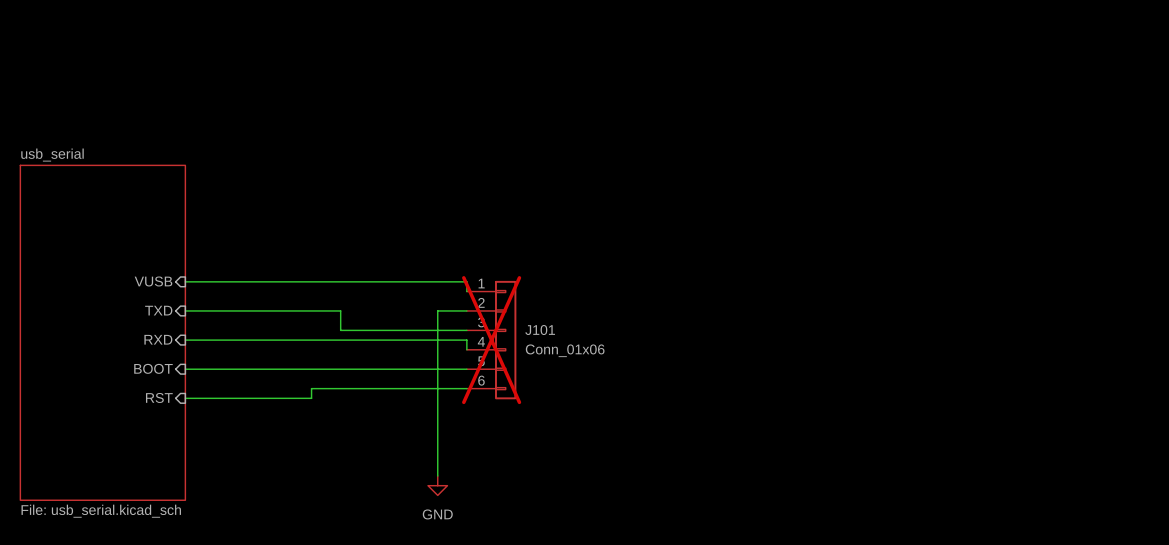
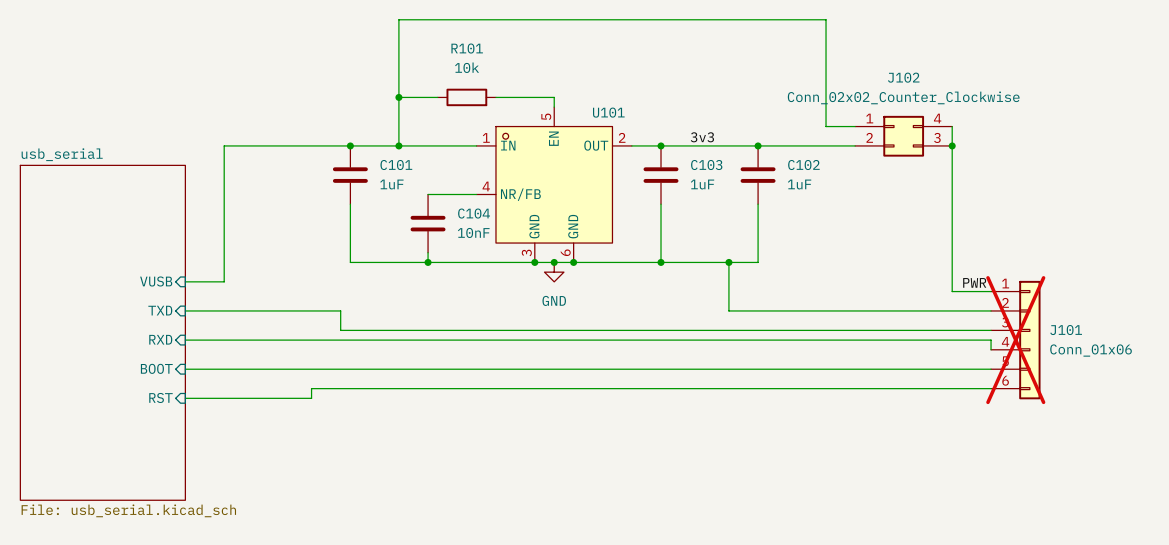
wire: none -> (398, 97) (437, 97)
junction: none -> (398, 97)
R101: none -> 10k (466, 97)
wire: none -> (495, 97) (554, 97) (554, 107)
wire: none -> (855, 126) (826, 126) (826, 19) (398, 19) (398, 145)
wire: none -> (952, 126) (952, 291) (991, 291)
J102: none -> Conn_02x02_Counter_Clockwise (903, 136)
label: none -> 3v3 (702, 137)
junction: none -> (350, 145)
junction: none -> (398, 145)
wire: none -> (631, 145) (855, 145)
junction: none -> (661, 145)
junction: none -> (758, 145)
junction: none -> (952, 145)
C101: none -> 1uF (350, 175)
C103: none -> 1uF (661, 175)
C102: none -> 1uF (758, 175)
U101: none -> (554, 184)
wire: none -> (428, 194) (476, 194)
wire: none -> (350, 204) (350, 262) (758, 262) (758, 204)
wire: none -> (661, 204) (661, 262)
C104: none -> 10nF (428, 223)
wire: none -> (428, 252) (428, 262)
junction: none -> (428, 262)
junction: none -> (534, 262)
junction: none -> (554, 262)
junction: none -> (573, 262)
junction: none -> (661, 262)
wire: none -> (728, 262) (728, 310) (991, 310)
junction: none -> (728, 262)
power symbol: none -> GND (554, 272)
wire: (224, 281) (466, 281) (466, 291) -> (224, 281) (224, 145) (476, 145)
label: none -> PWR (974, 282)
wire: (466, 310) (437, 310) (437, 475) -> none
wire: none -> (466, 330) (991, 330)
wire: (466, 340) (466, 349) -> (466, 340) (991, 340) (991, 349)
J101 position: (491, 340) -> (1015, 340)
wire: none -> (466, 369) (991, 369)
wire: none -> (466, 388) (991, 388)
power symbol: GND (437, 485) -> none

